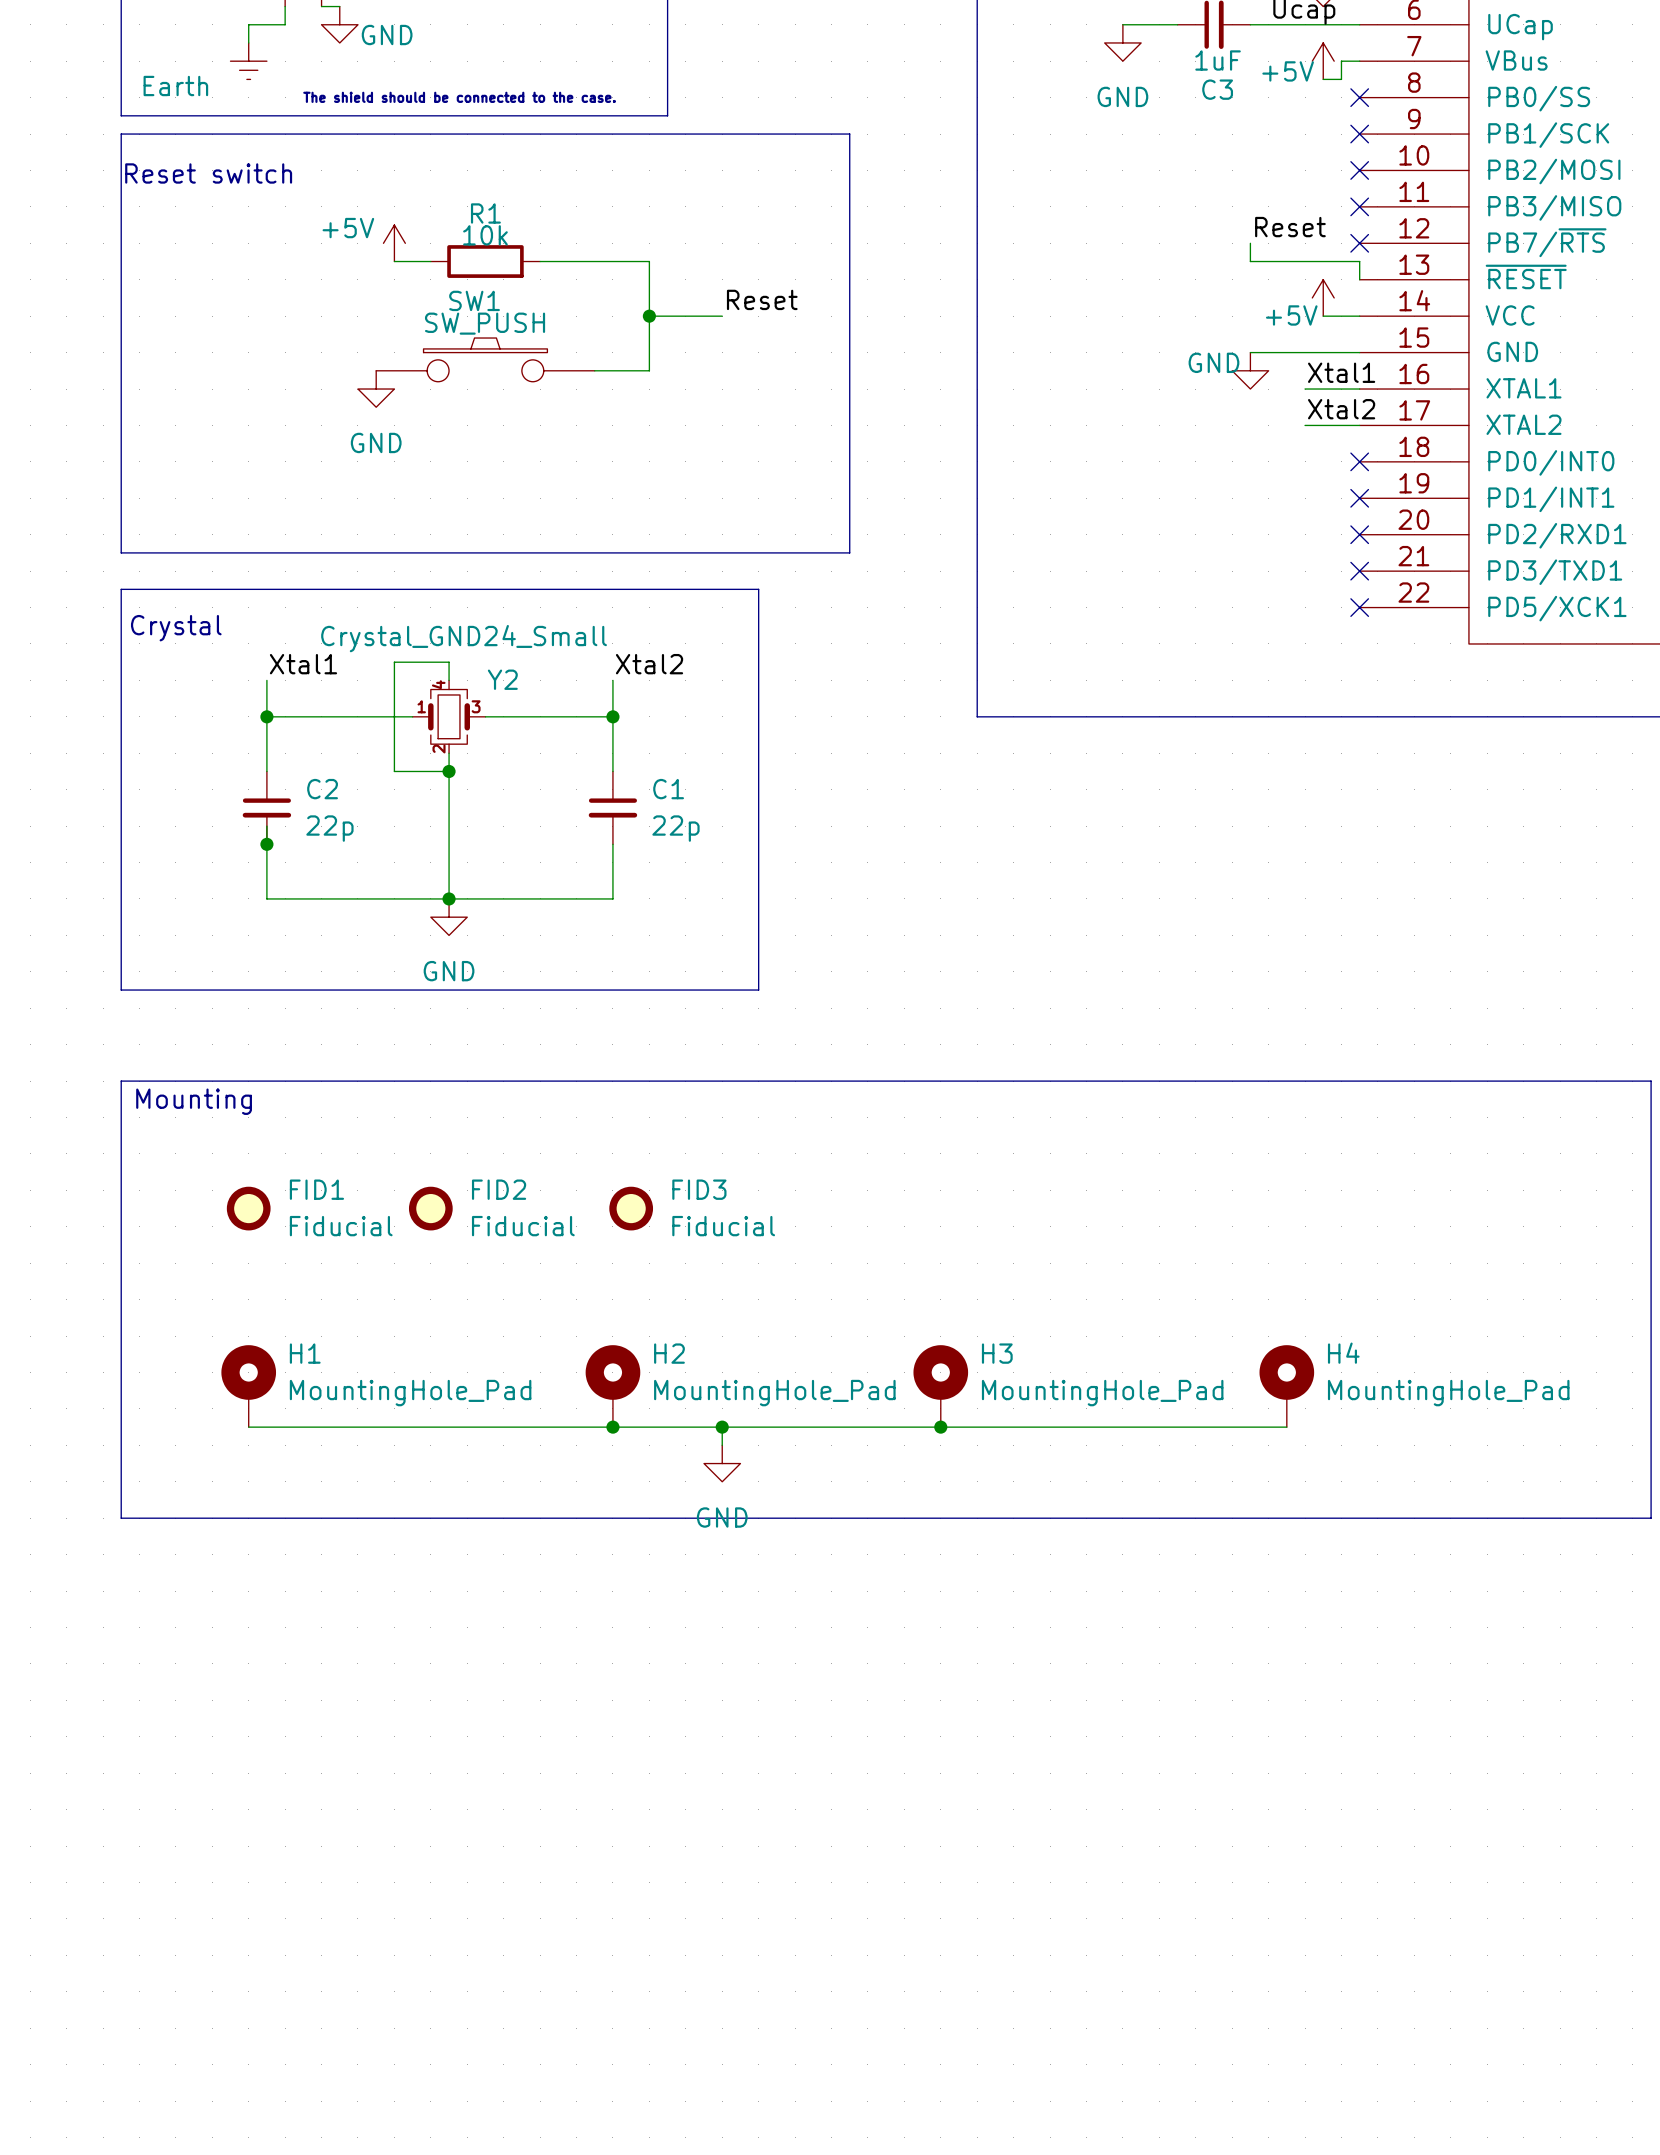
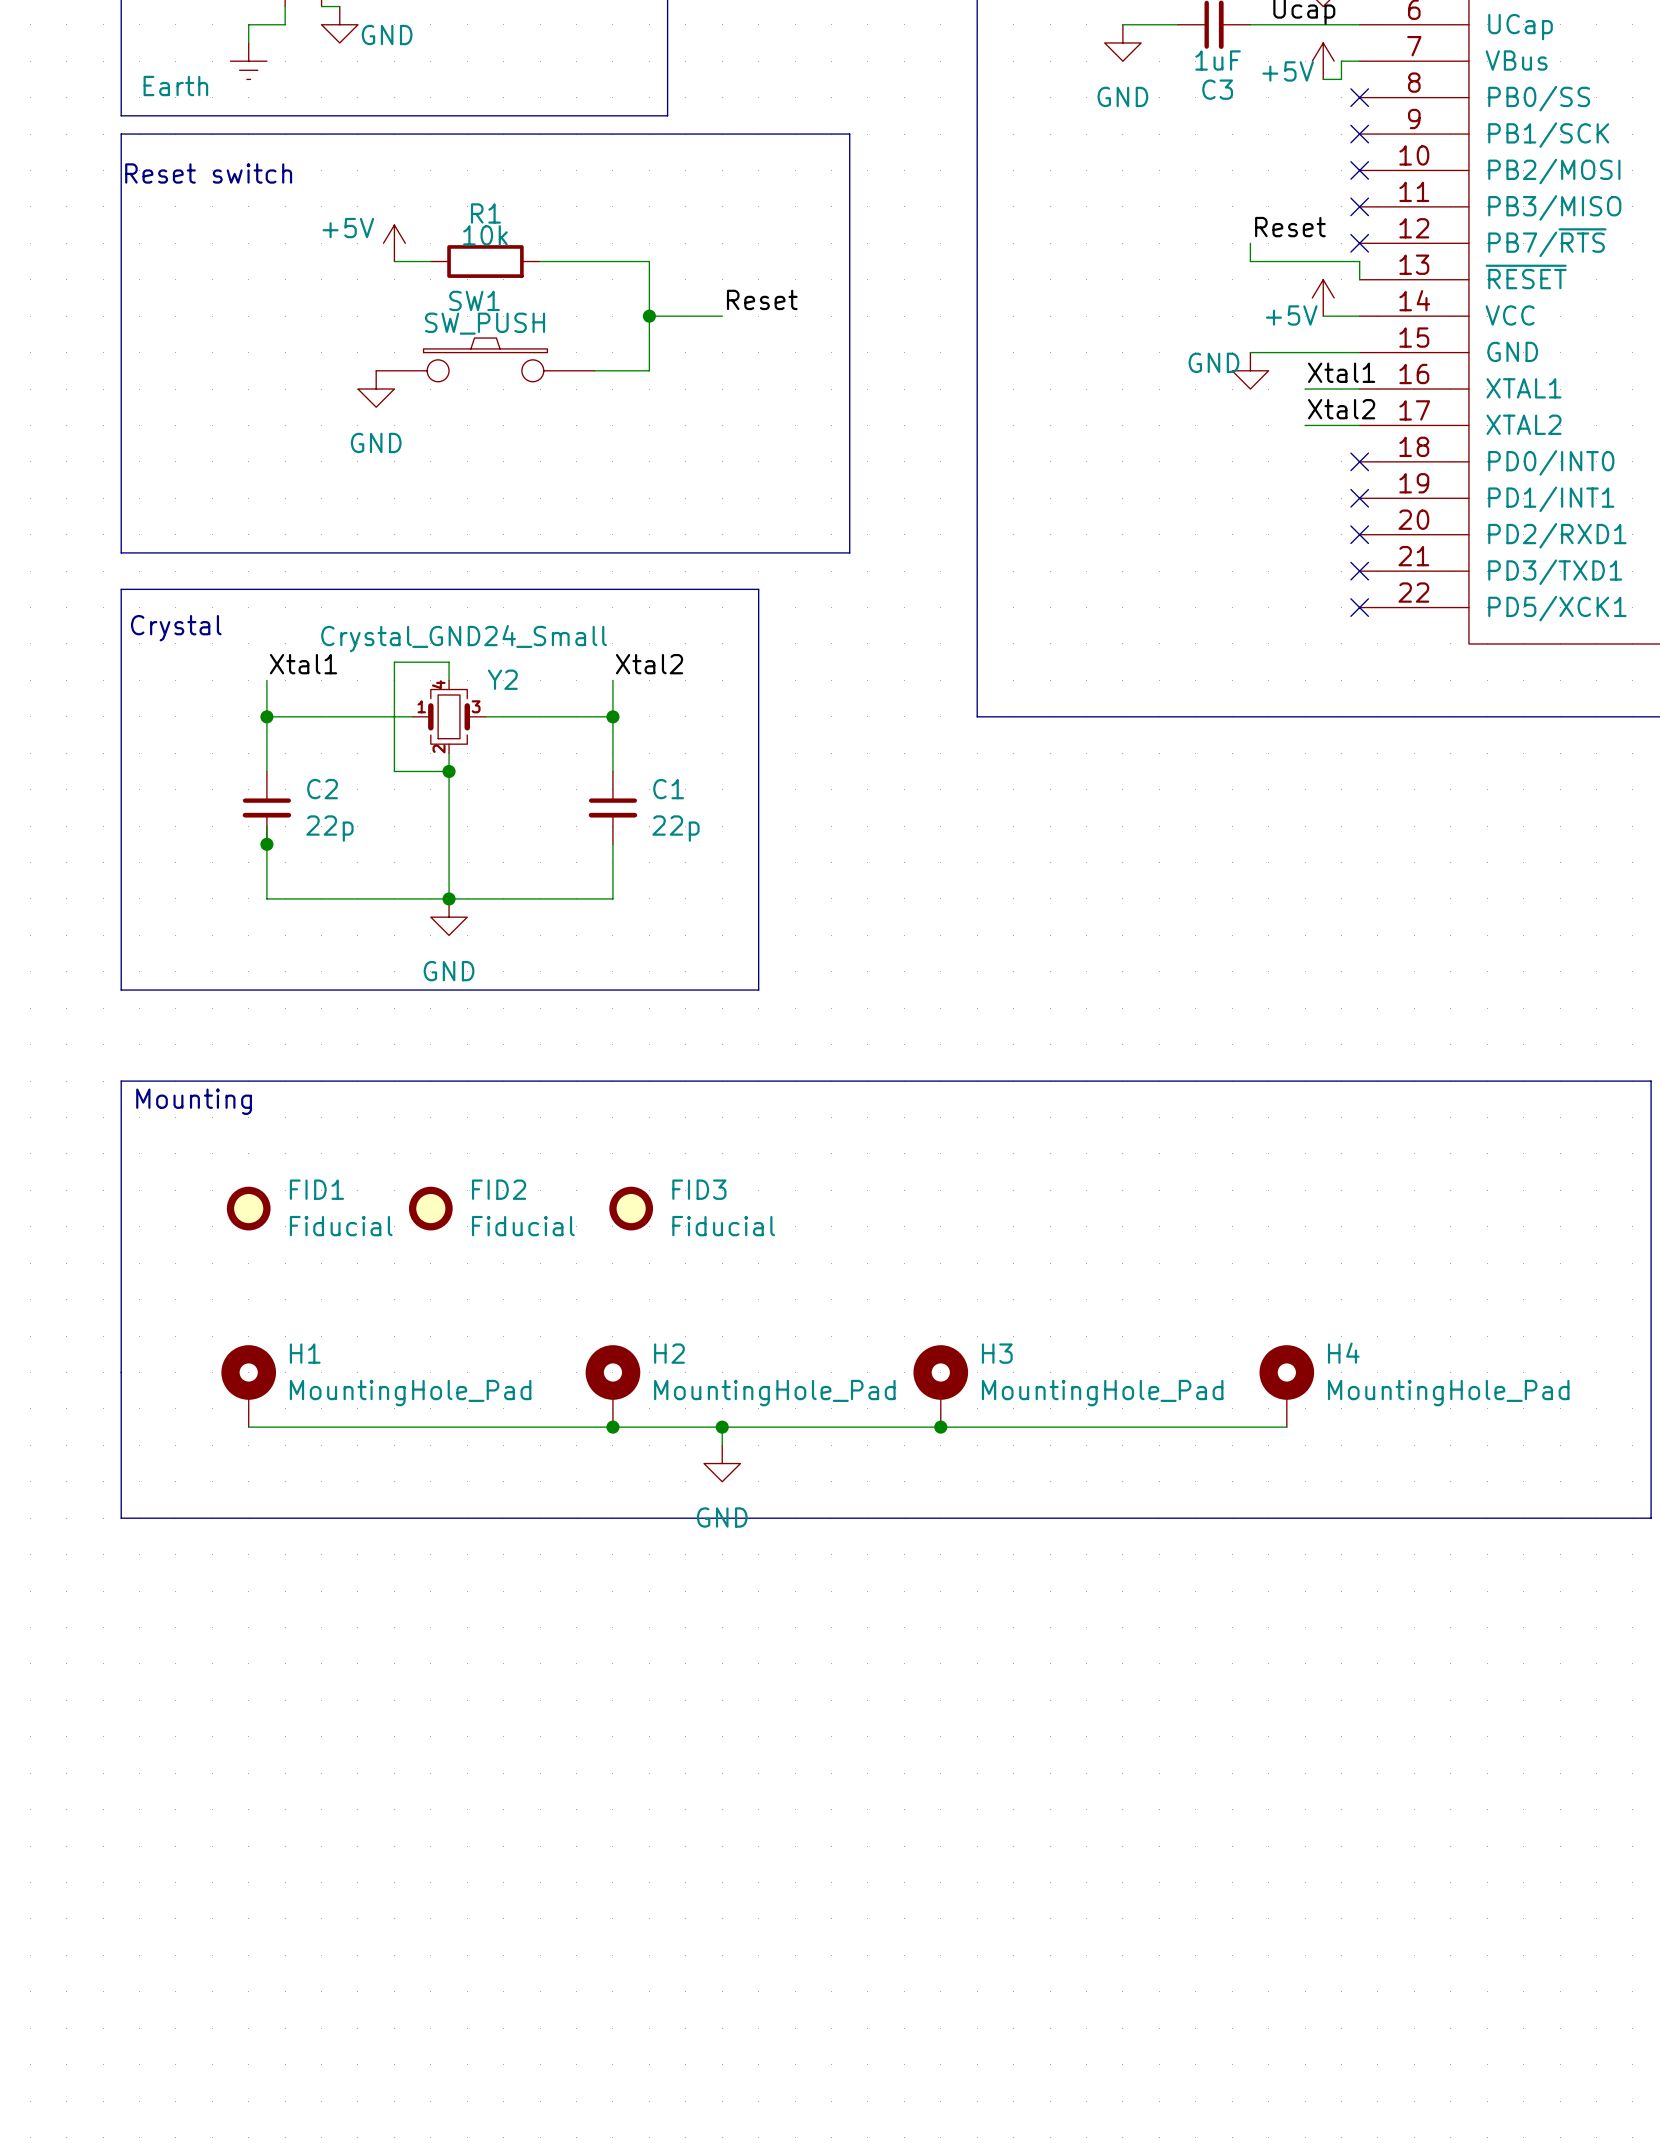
text: The shield should be connected to the case. (459, 97) -> none

